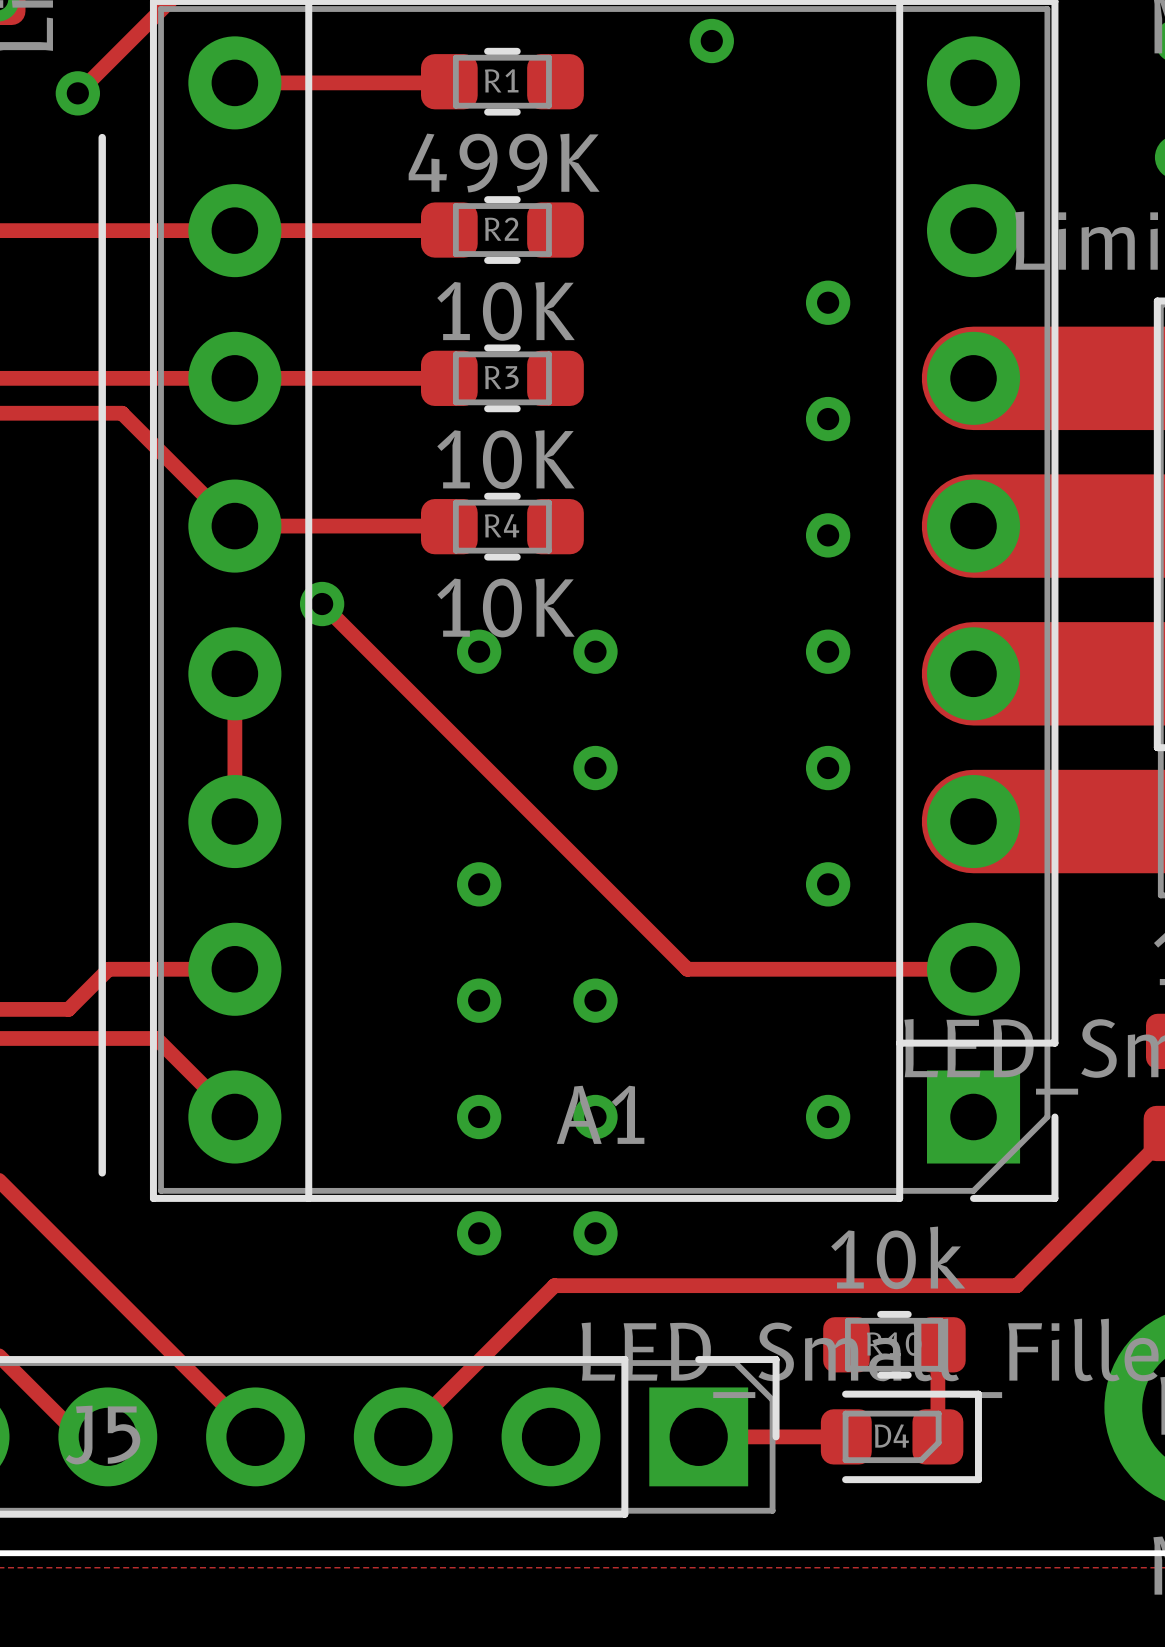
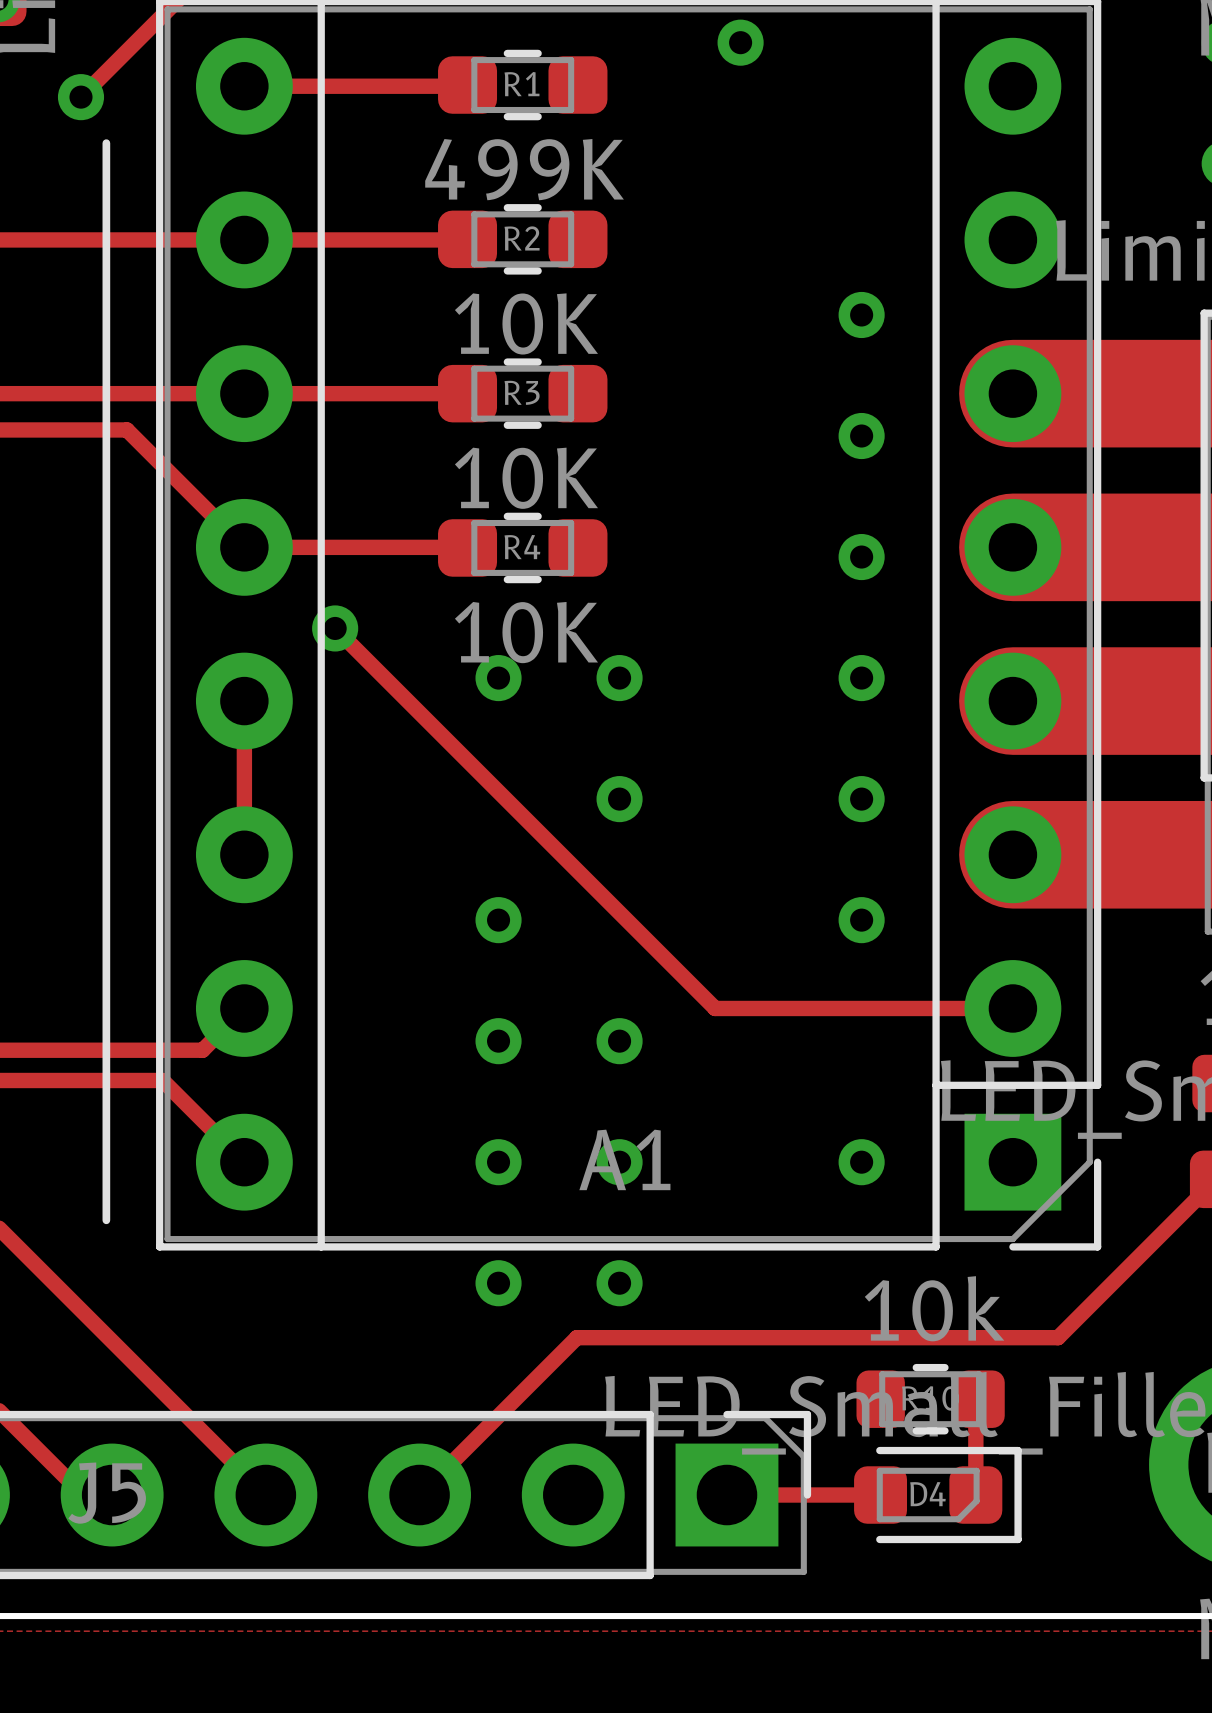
track: (234, 969) (108, 969) (68, 1009) -> (244, 1008) (202, 1050) (71, 1050)

